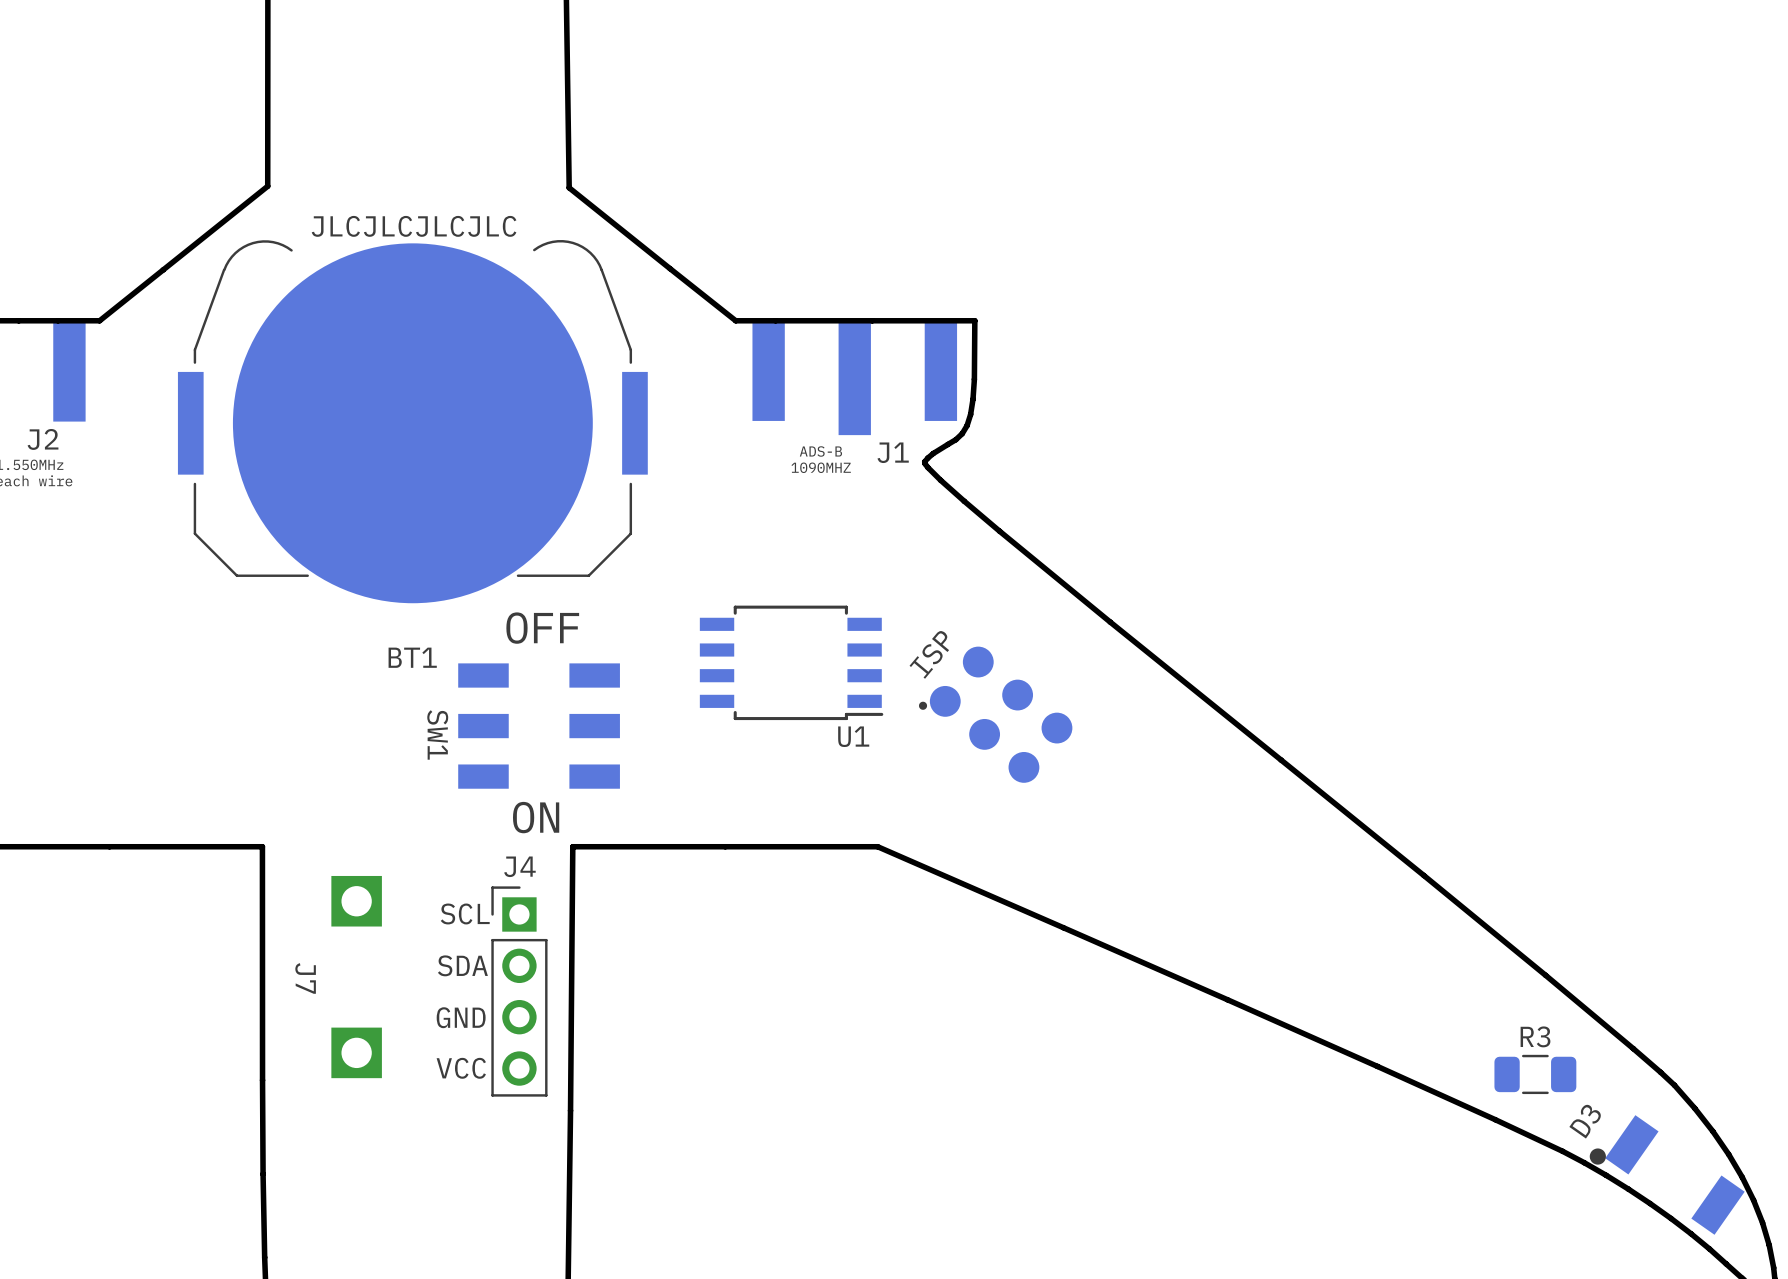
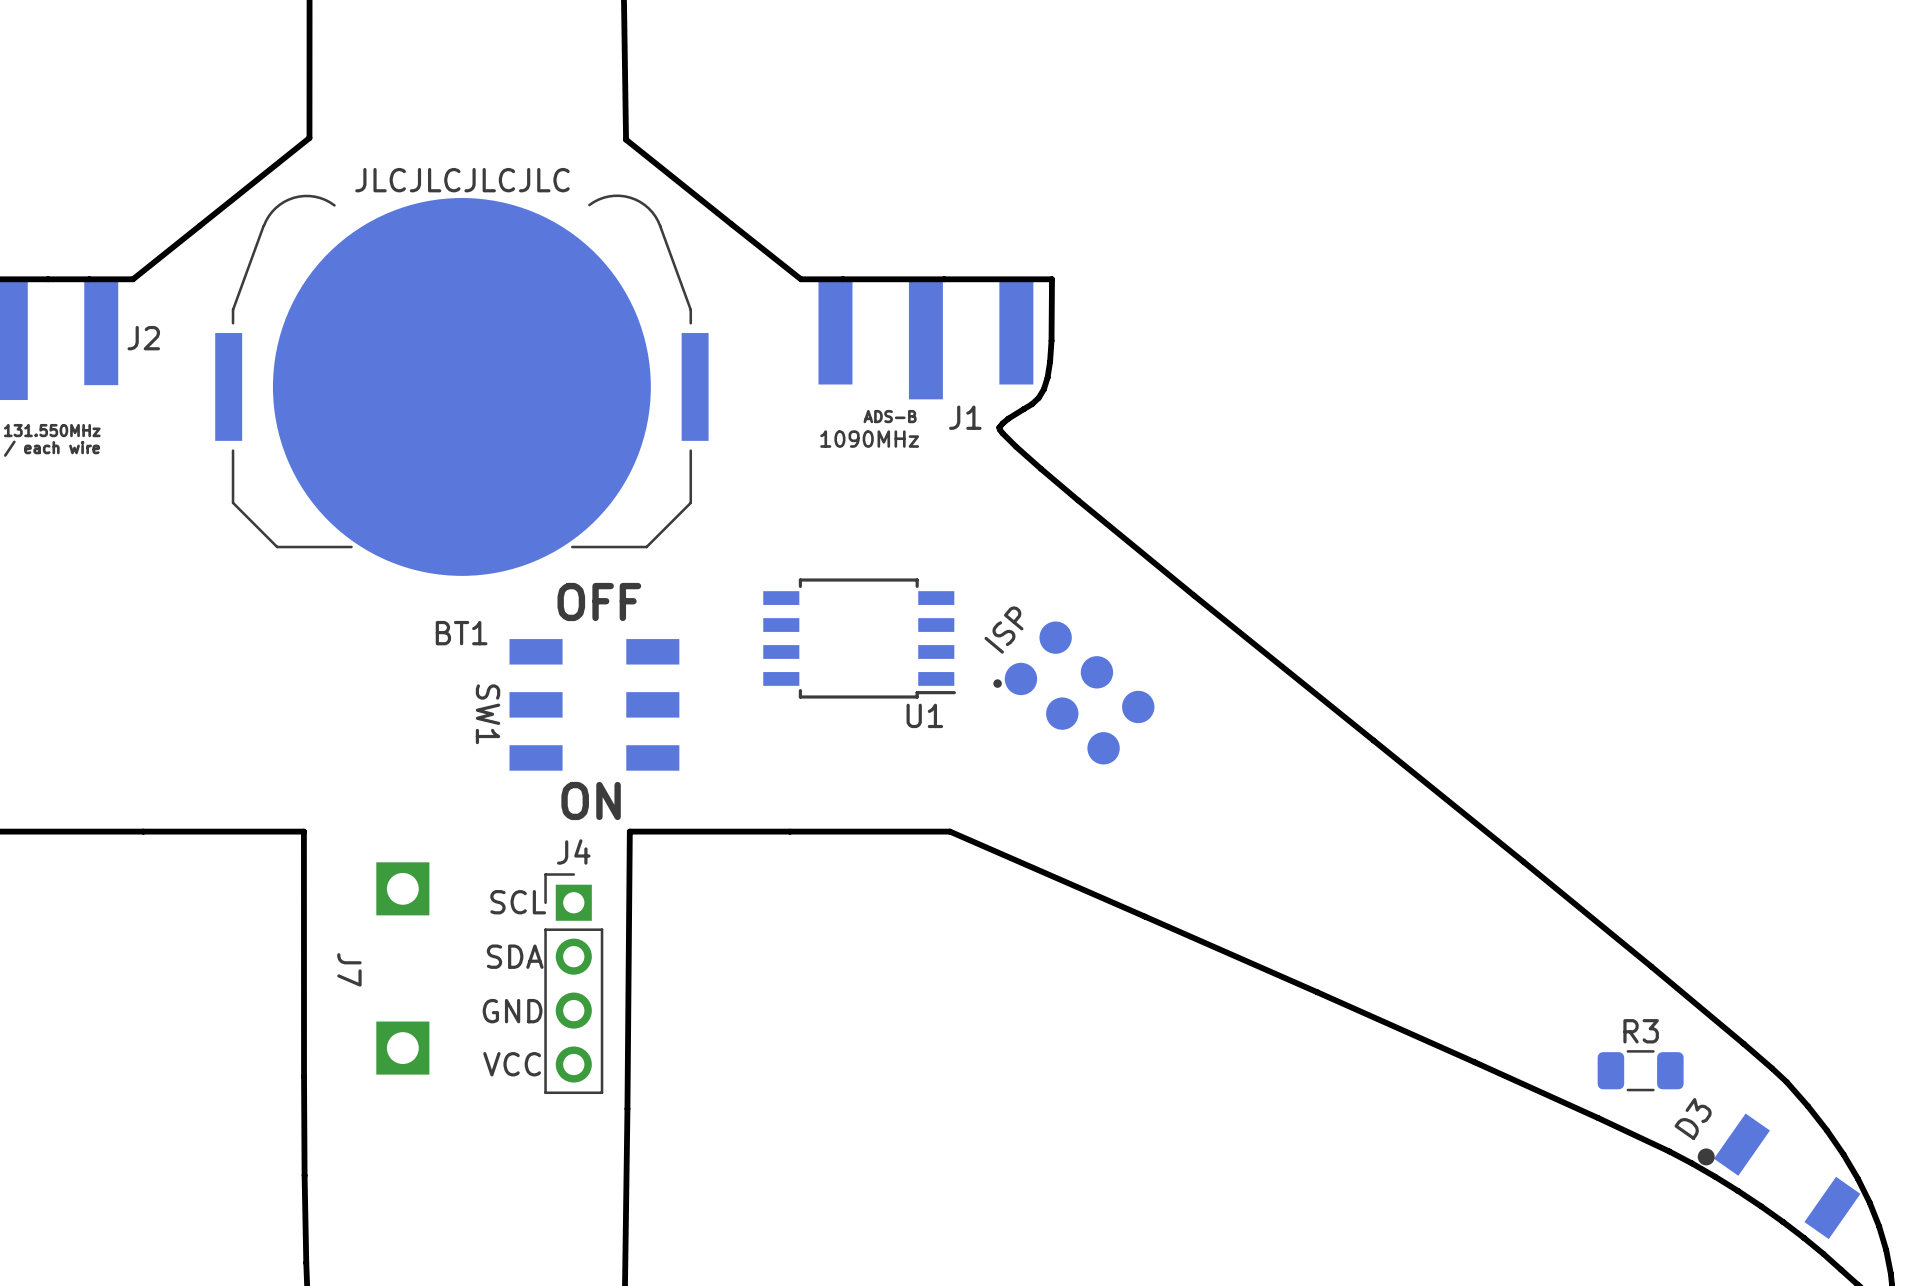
J2 name position: J2 (43, 439) -> J2 (143, 338)
text: 1090MHZ (821, 467) -> 1090MHz (869, 439)

